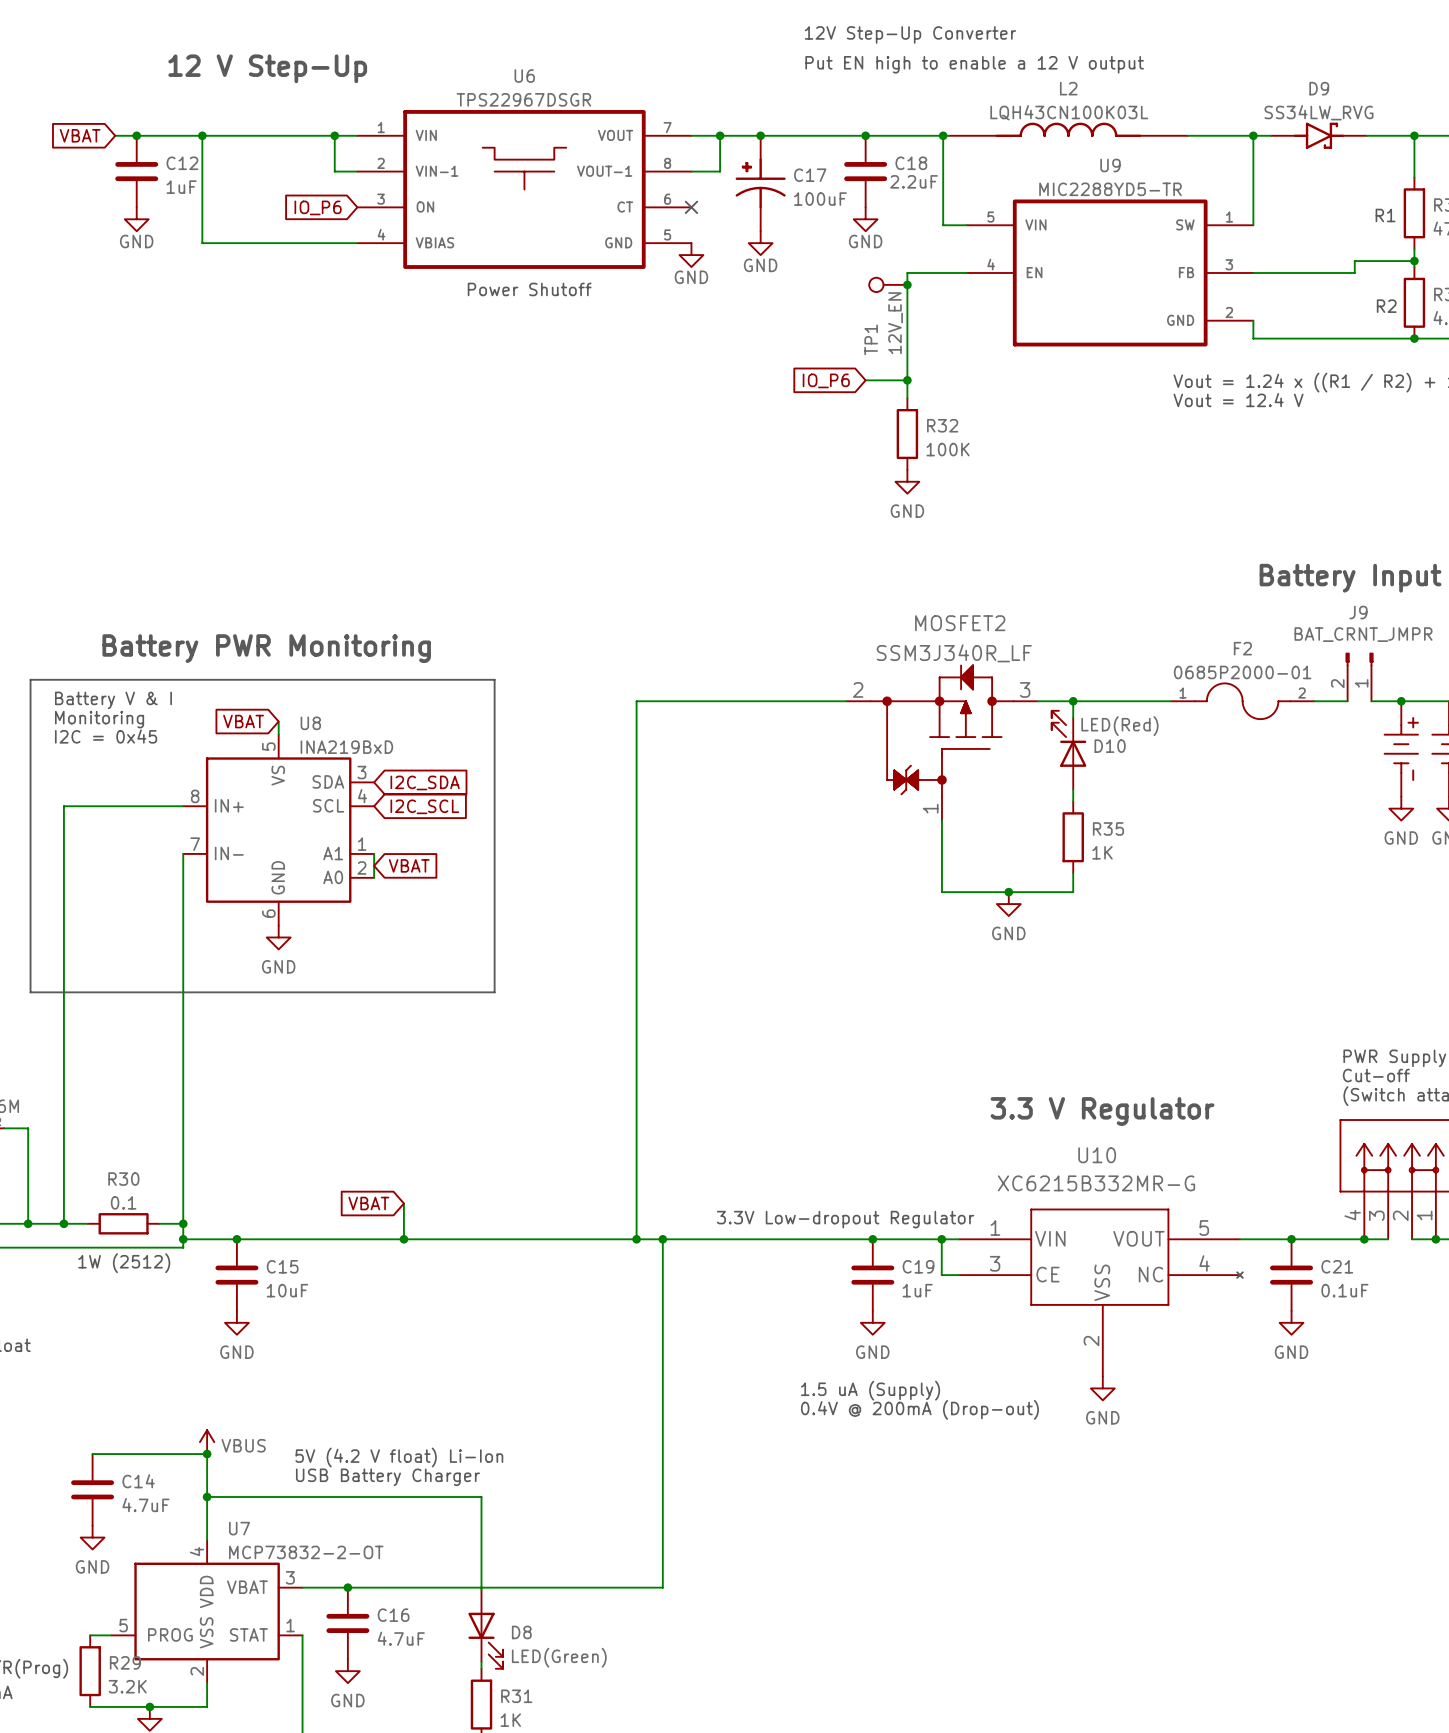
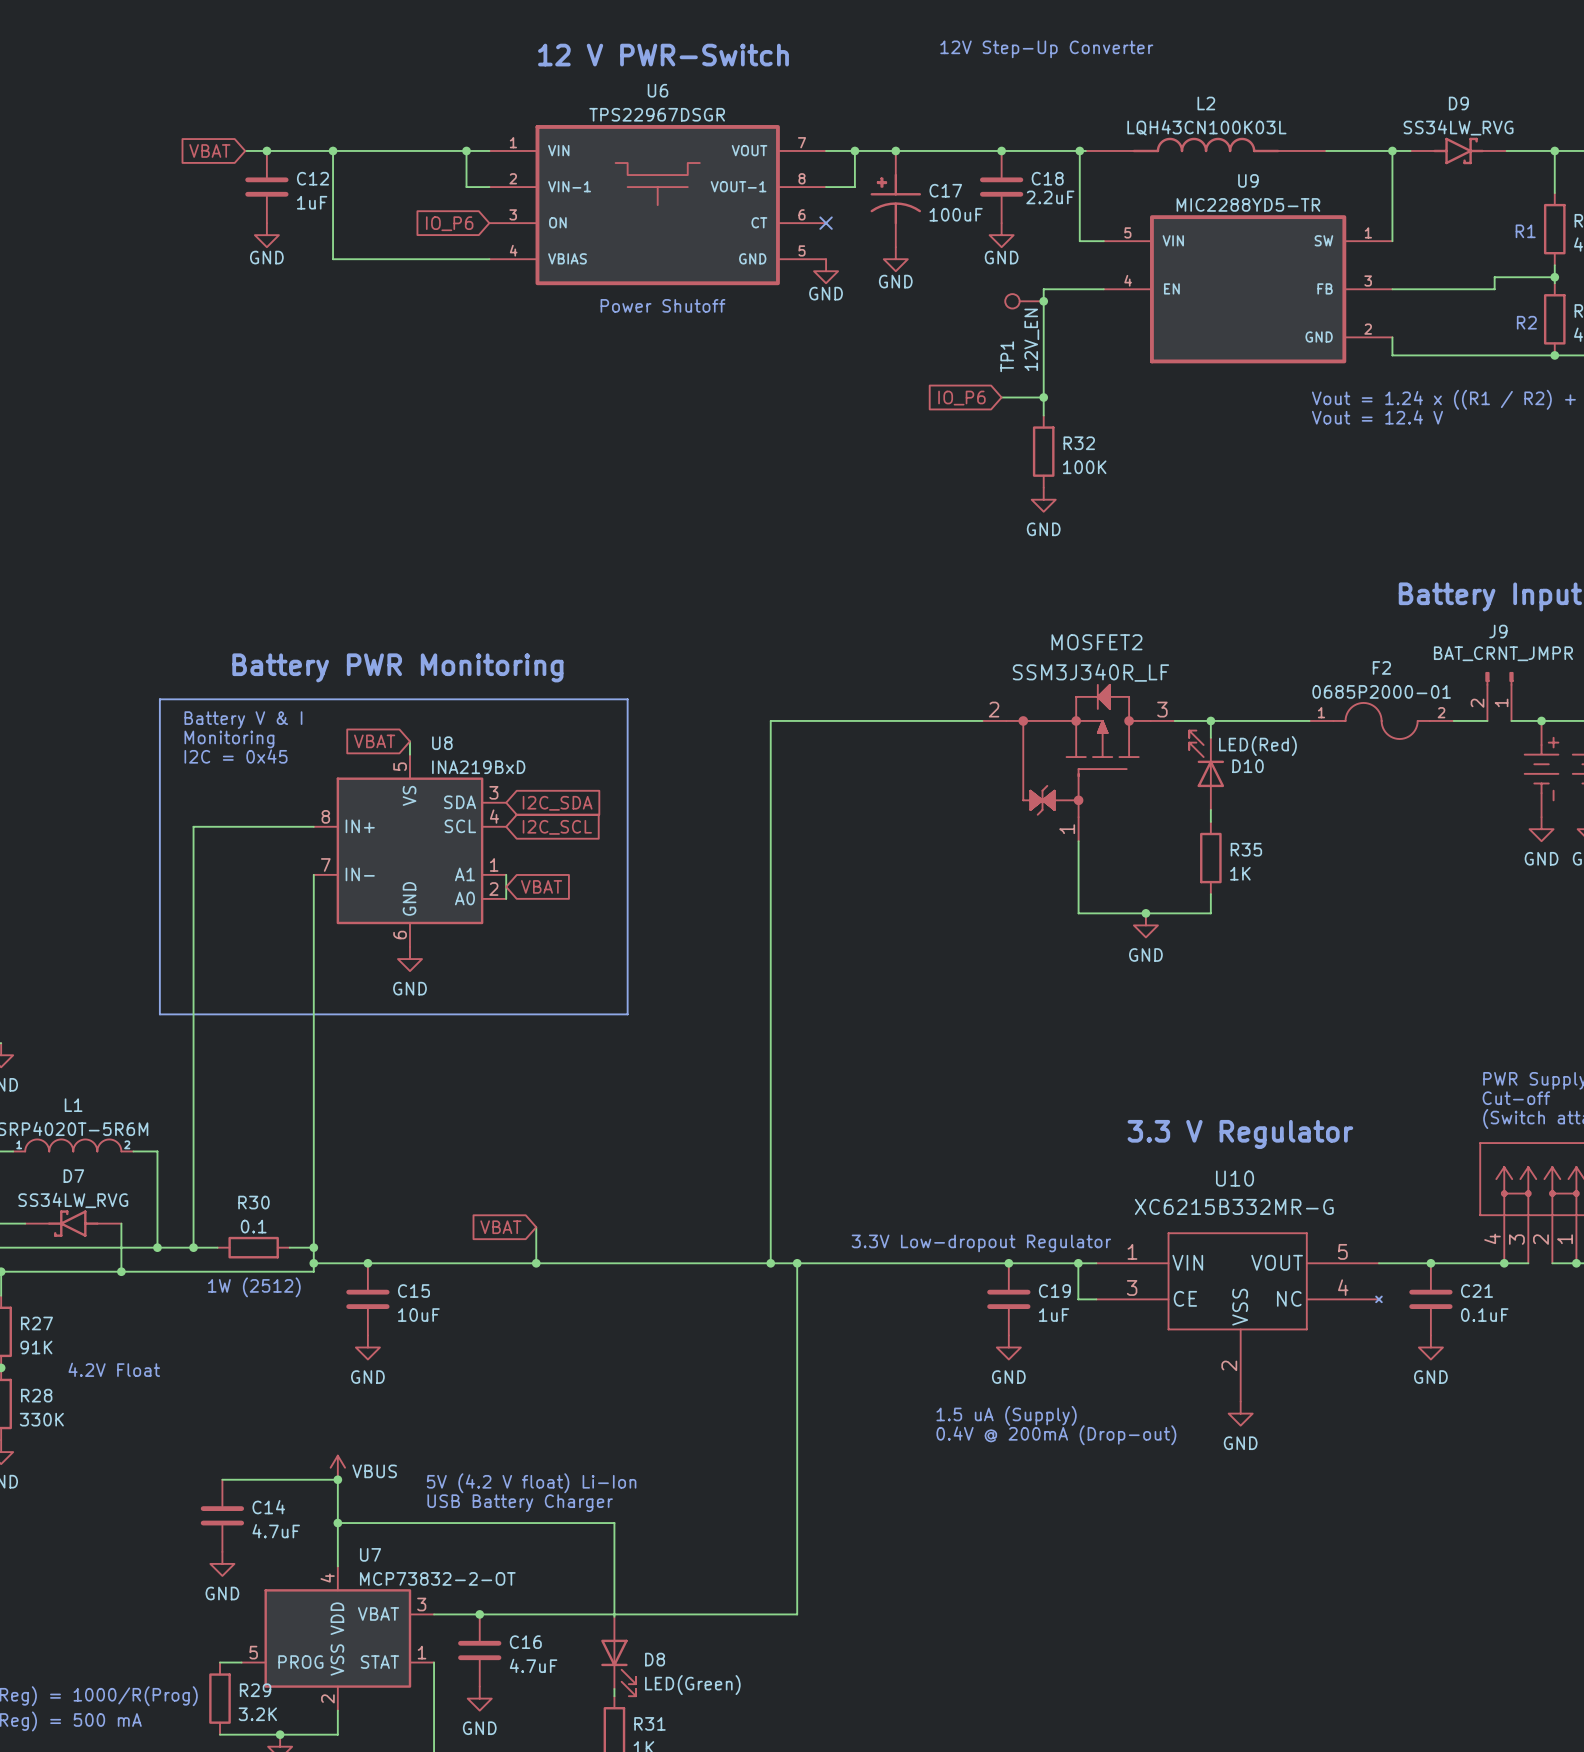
text: none -> 12 V PWR-Switch (663, 55)
text: Put EN high to enable a 12 V output (974, 64) -> none
text: 12 V Step-Up (267, 68) -> none

